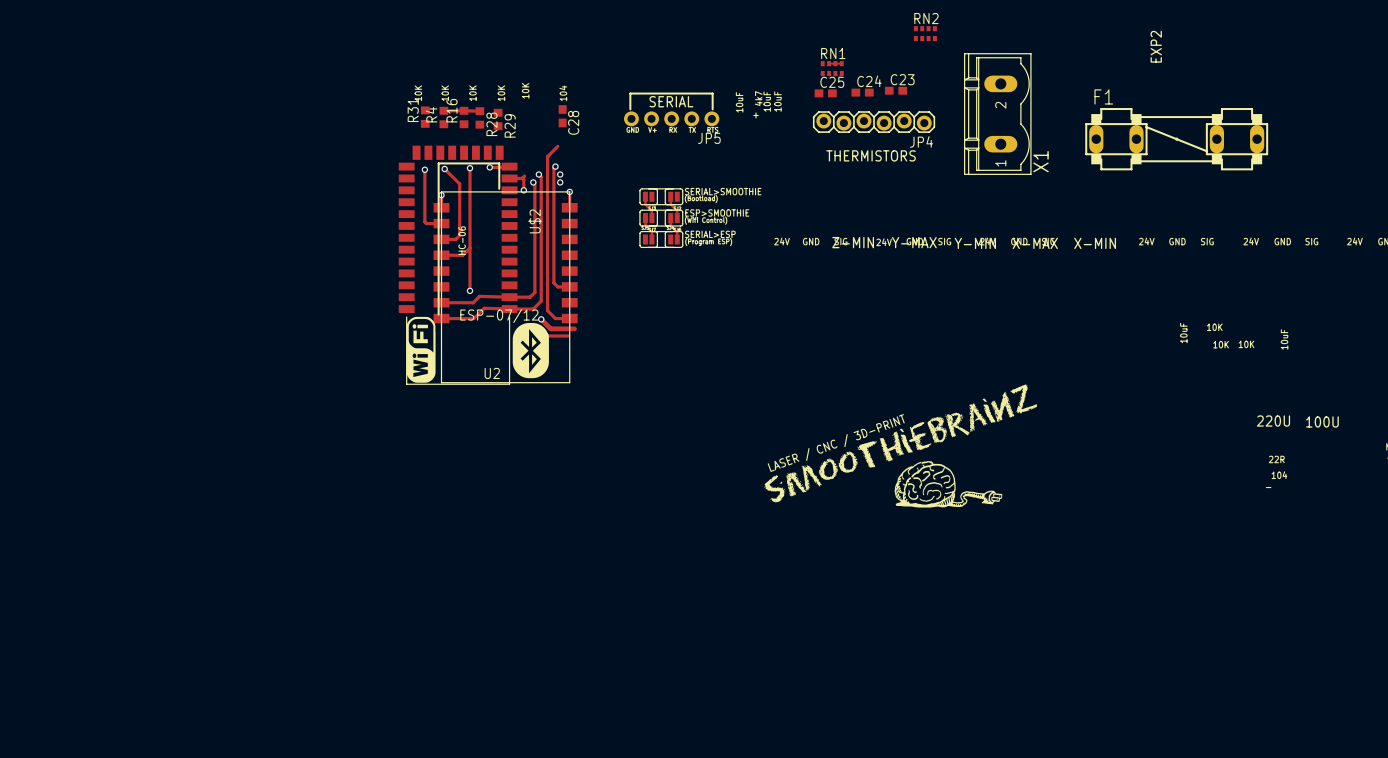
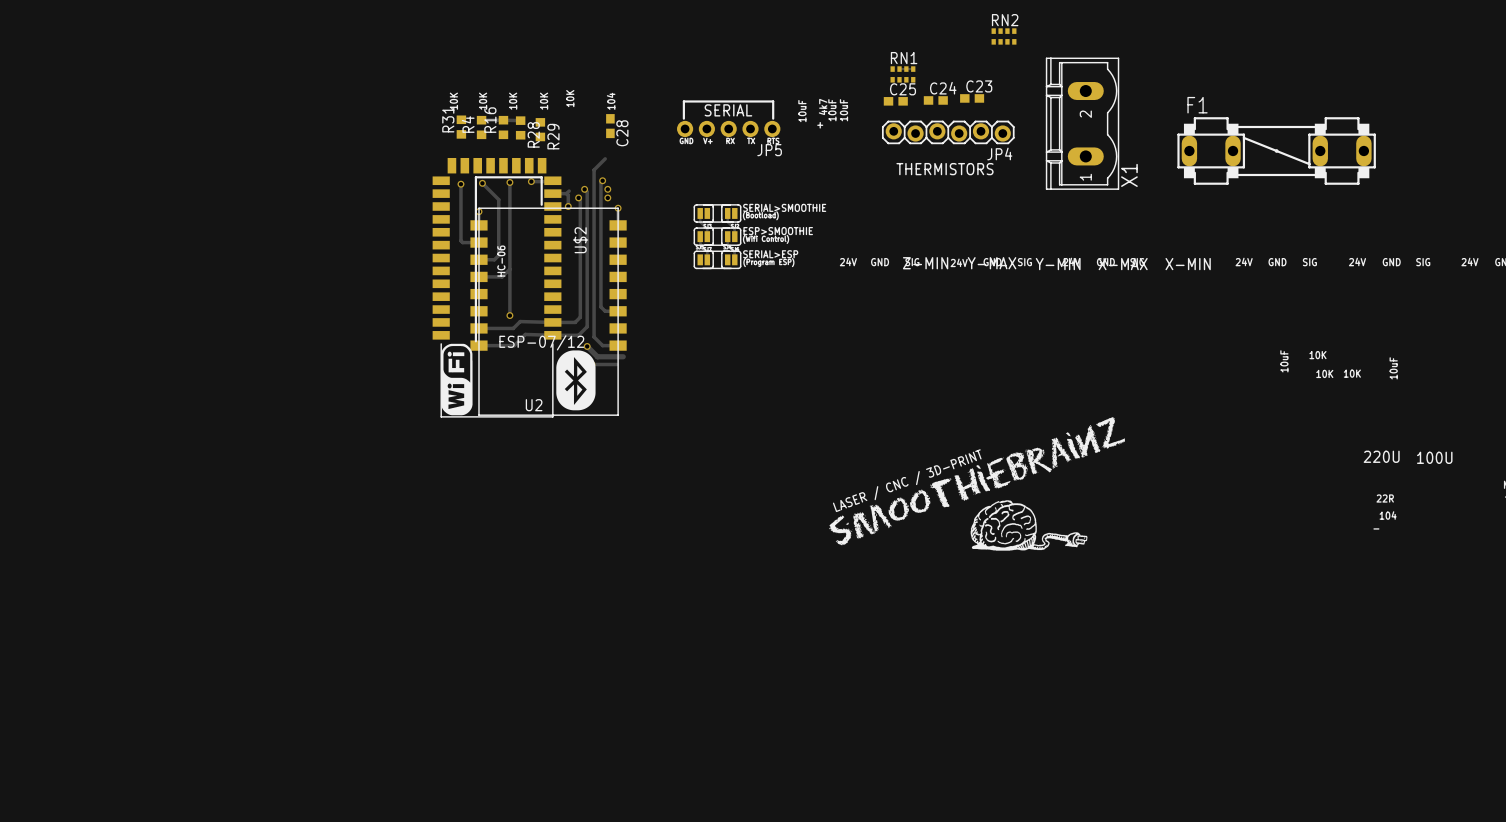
text: EXP2 (1156, 46) -> none

